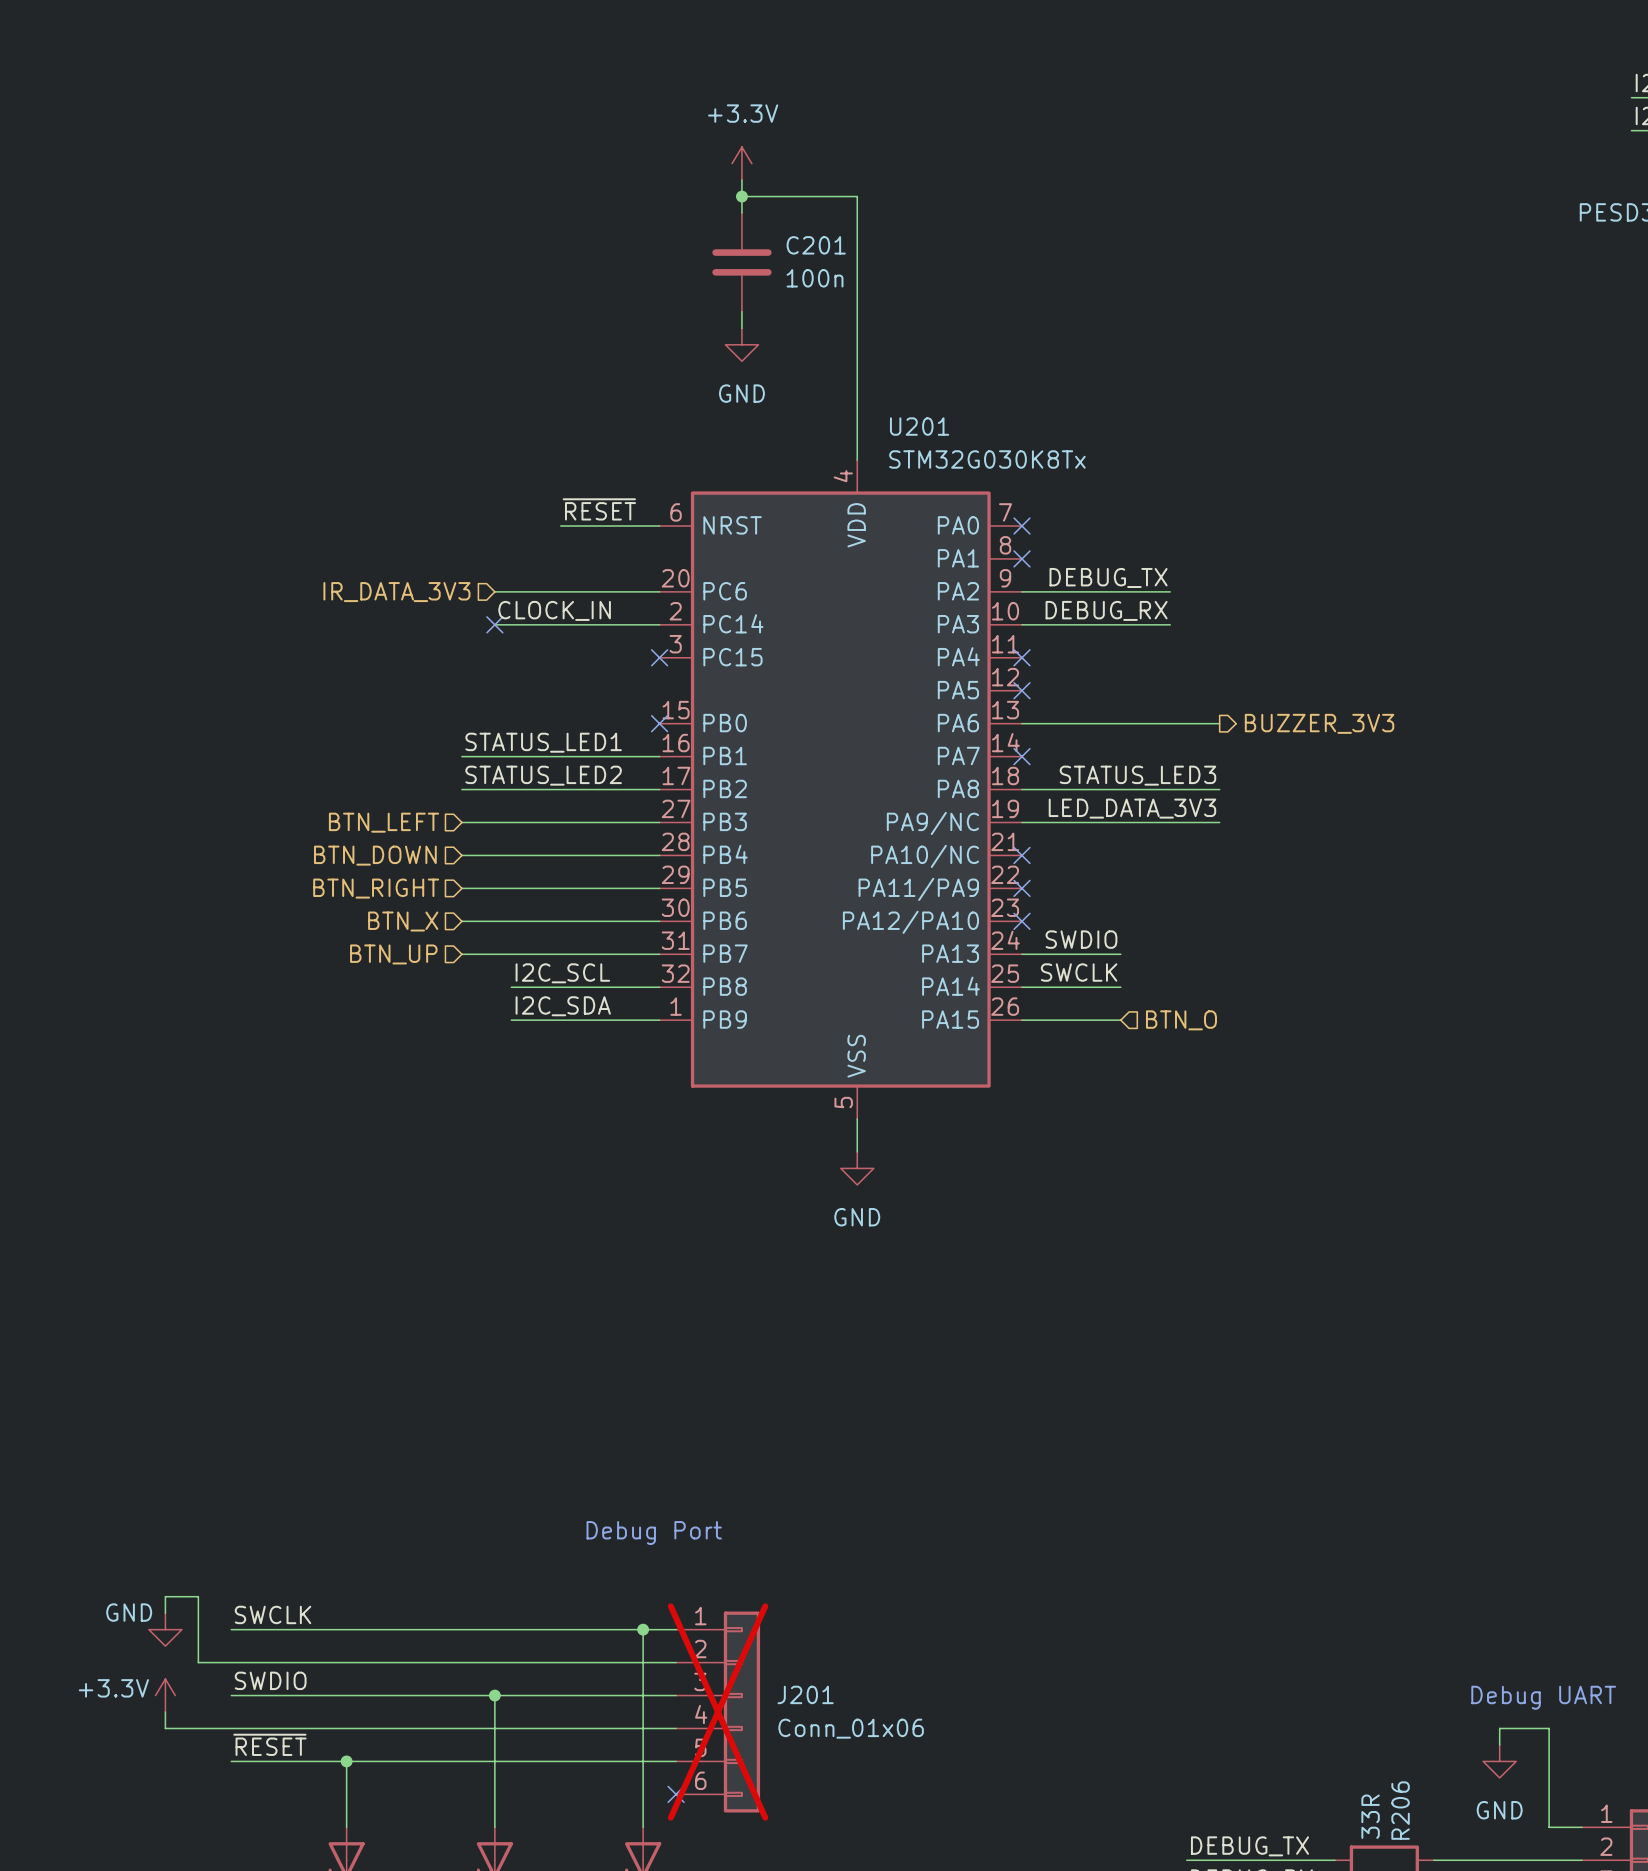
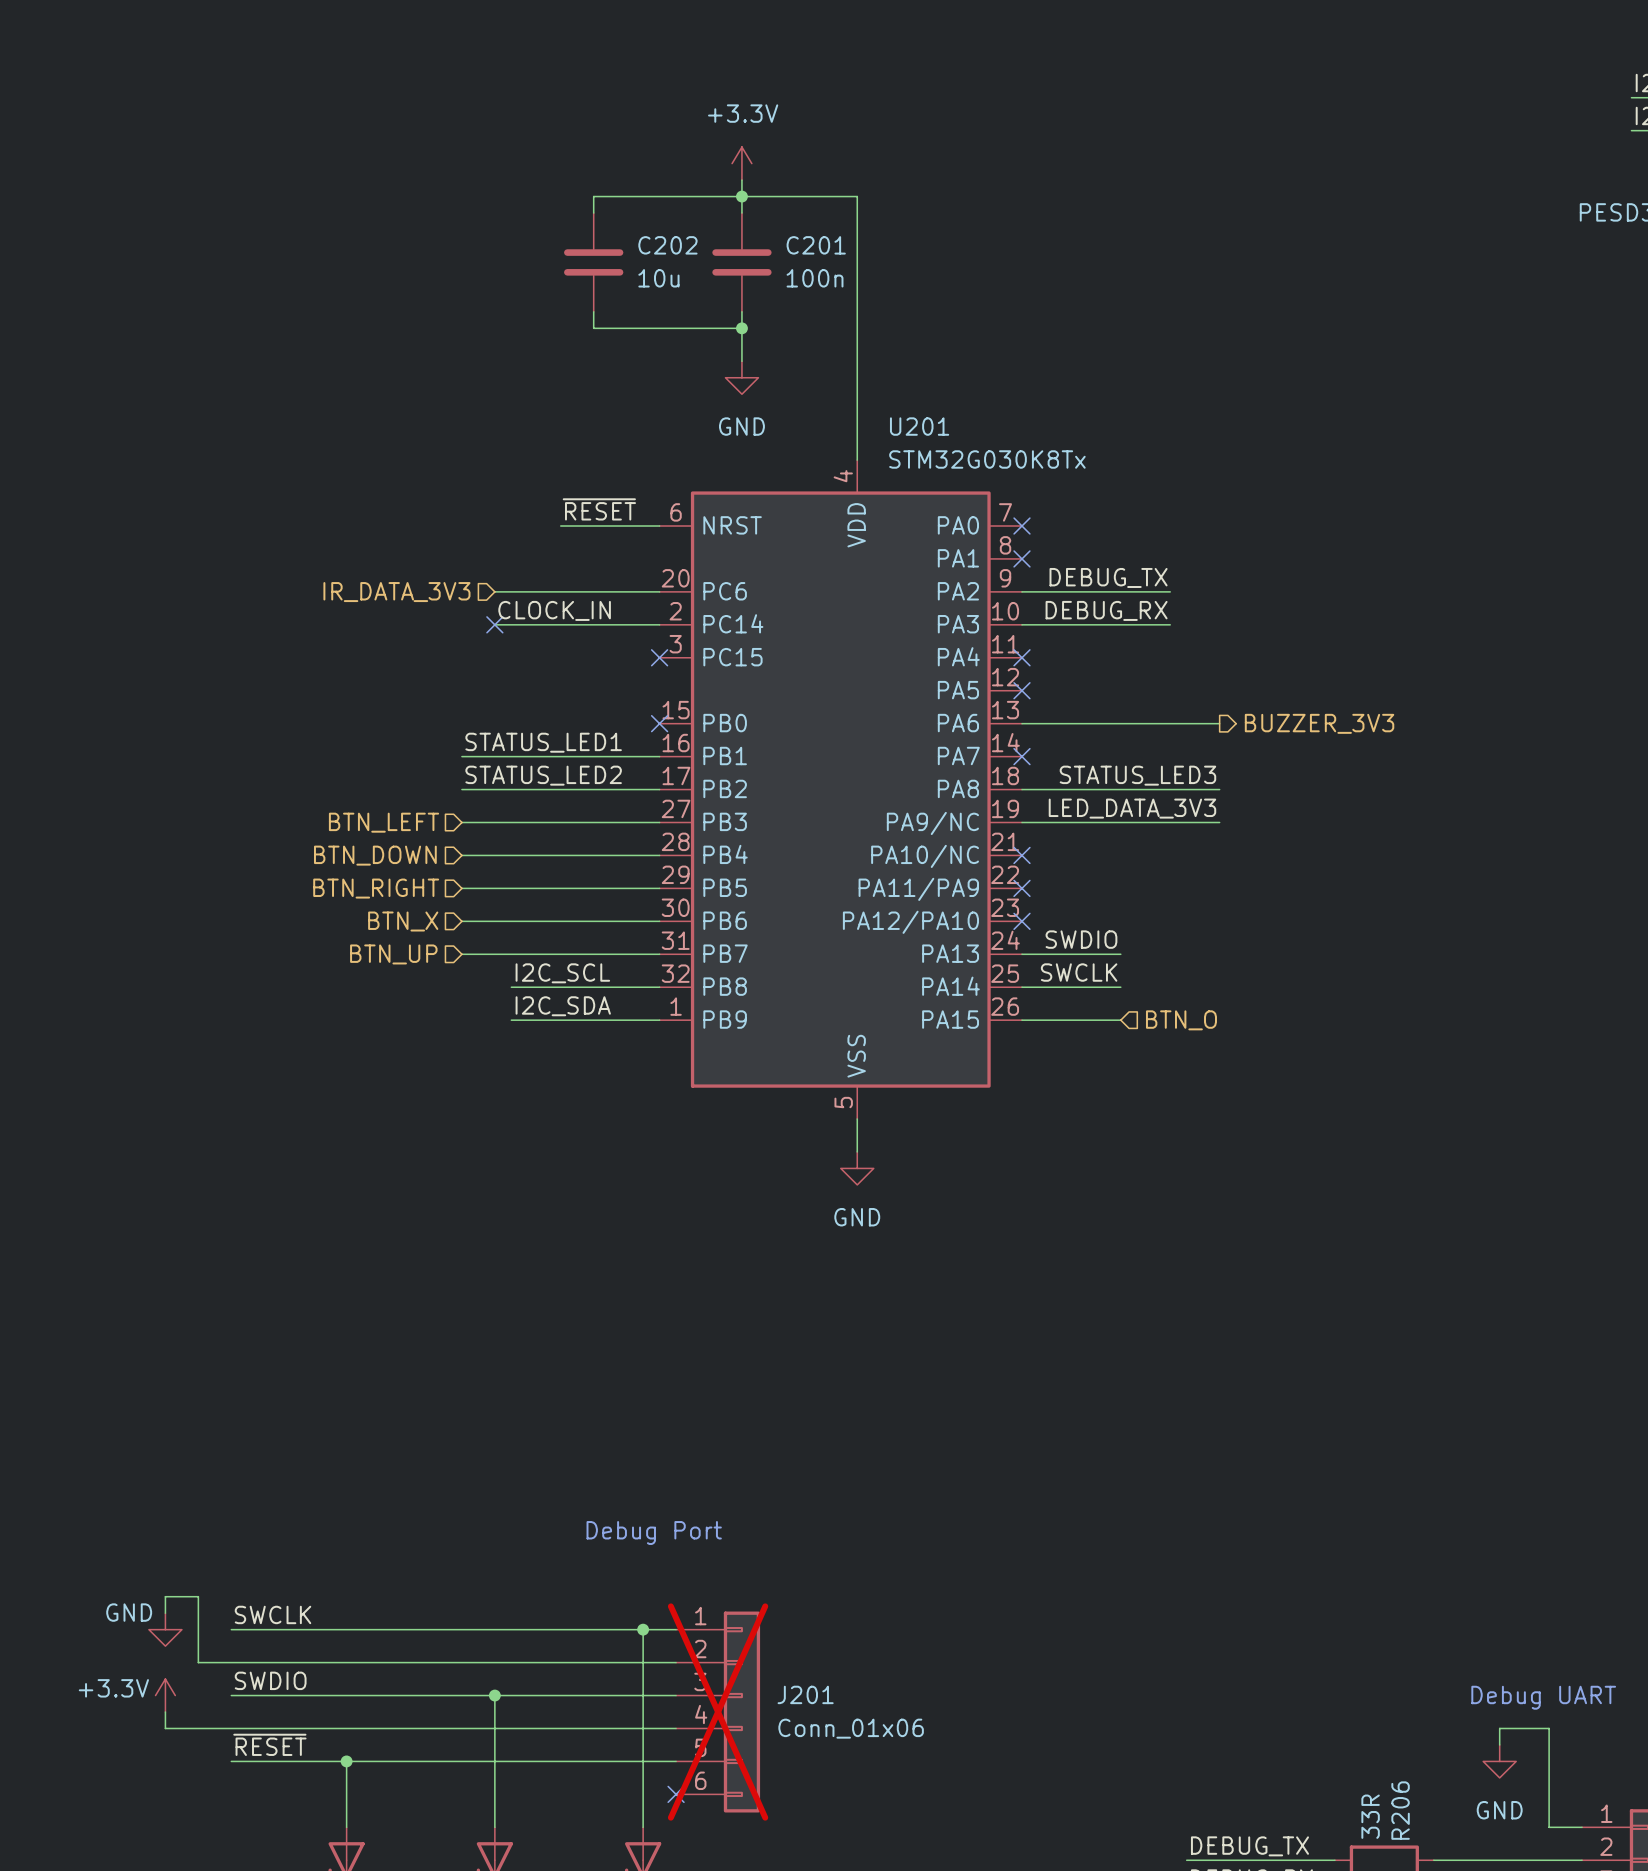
wire: none -> (741, 196) (593, 196) (593, 213)
C202: none -> 10u (593, 262)
wire: none -> (593, 311) (593, 328) (741, 328) (741, 361)
junction: none -> (741, 328)
power symbol position: GND (741, 344) -> GND (741, 377)

